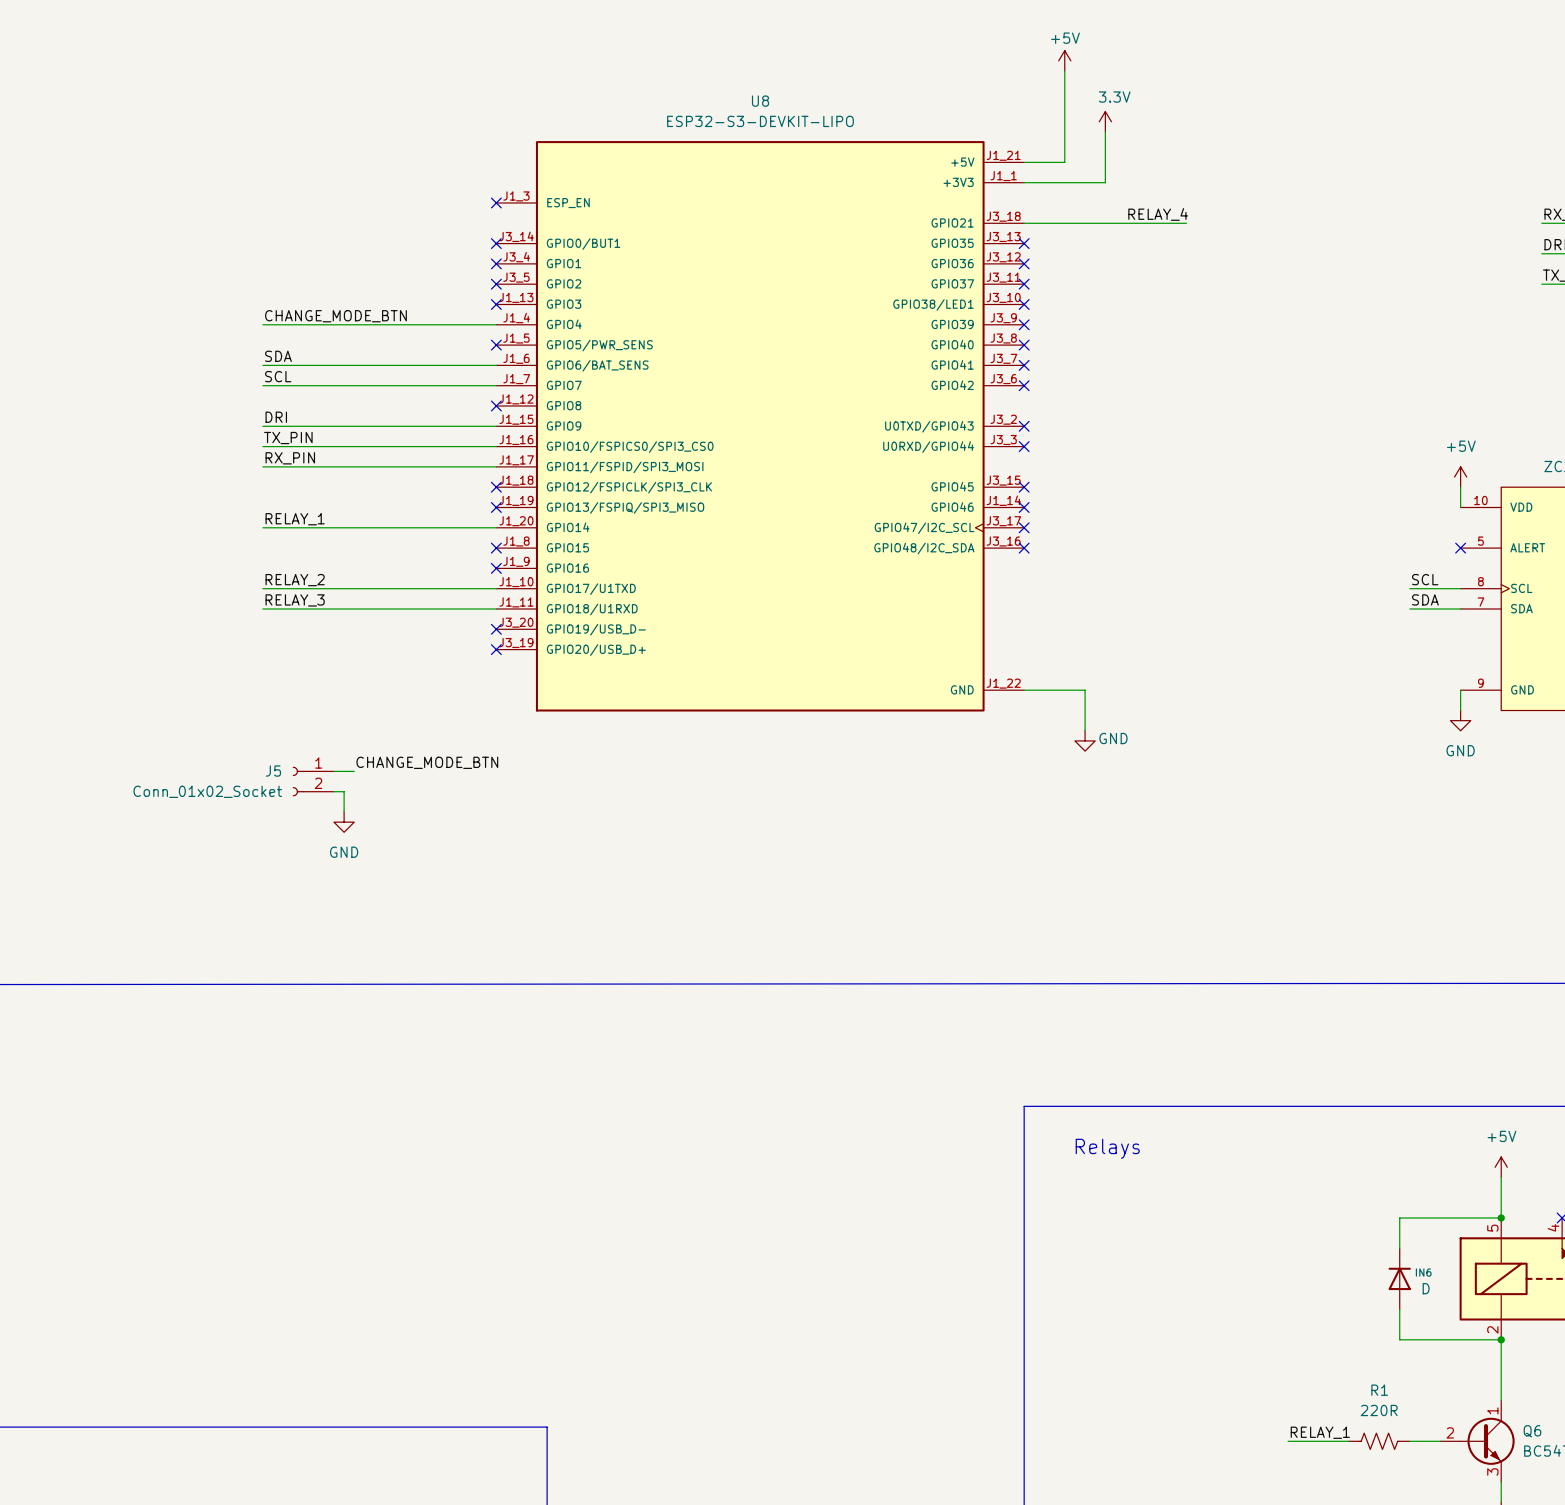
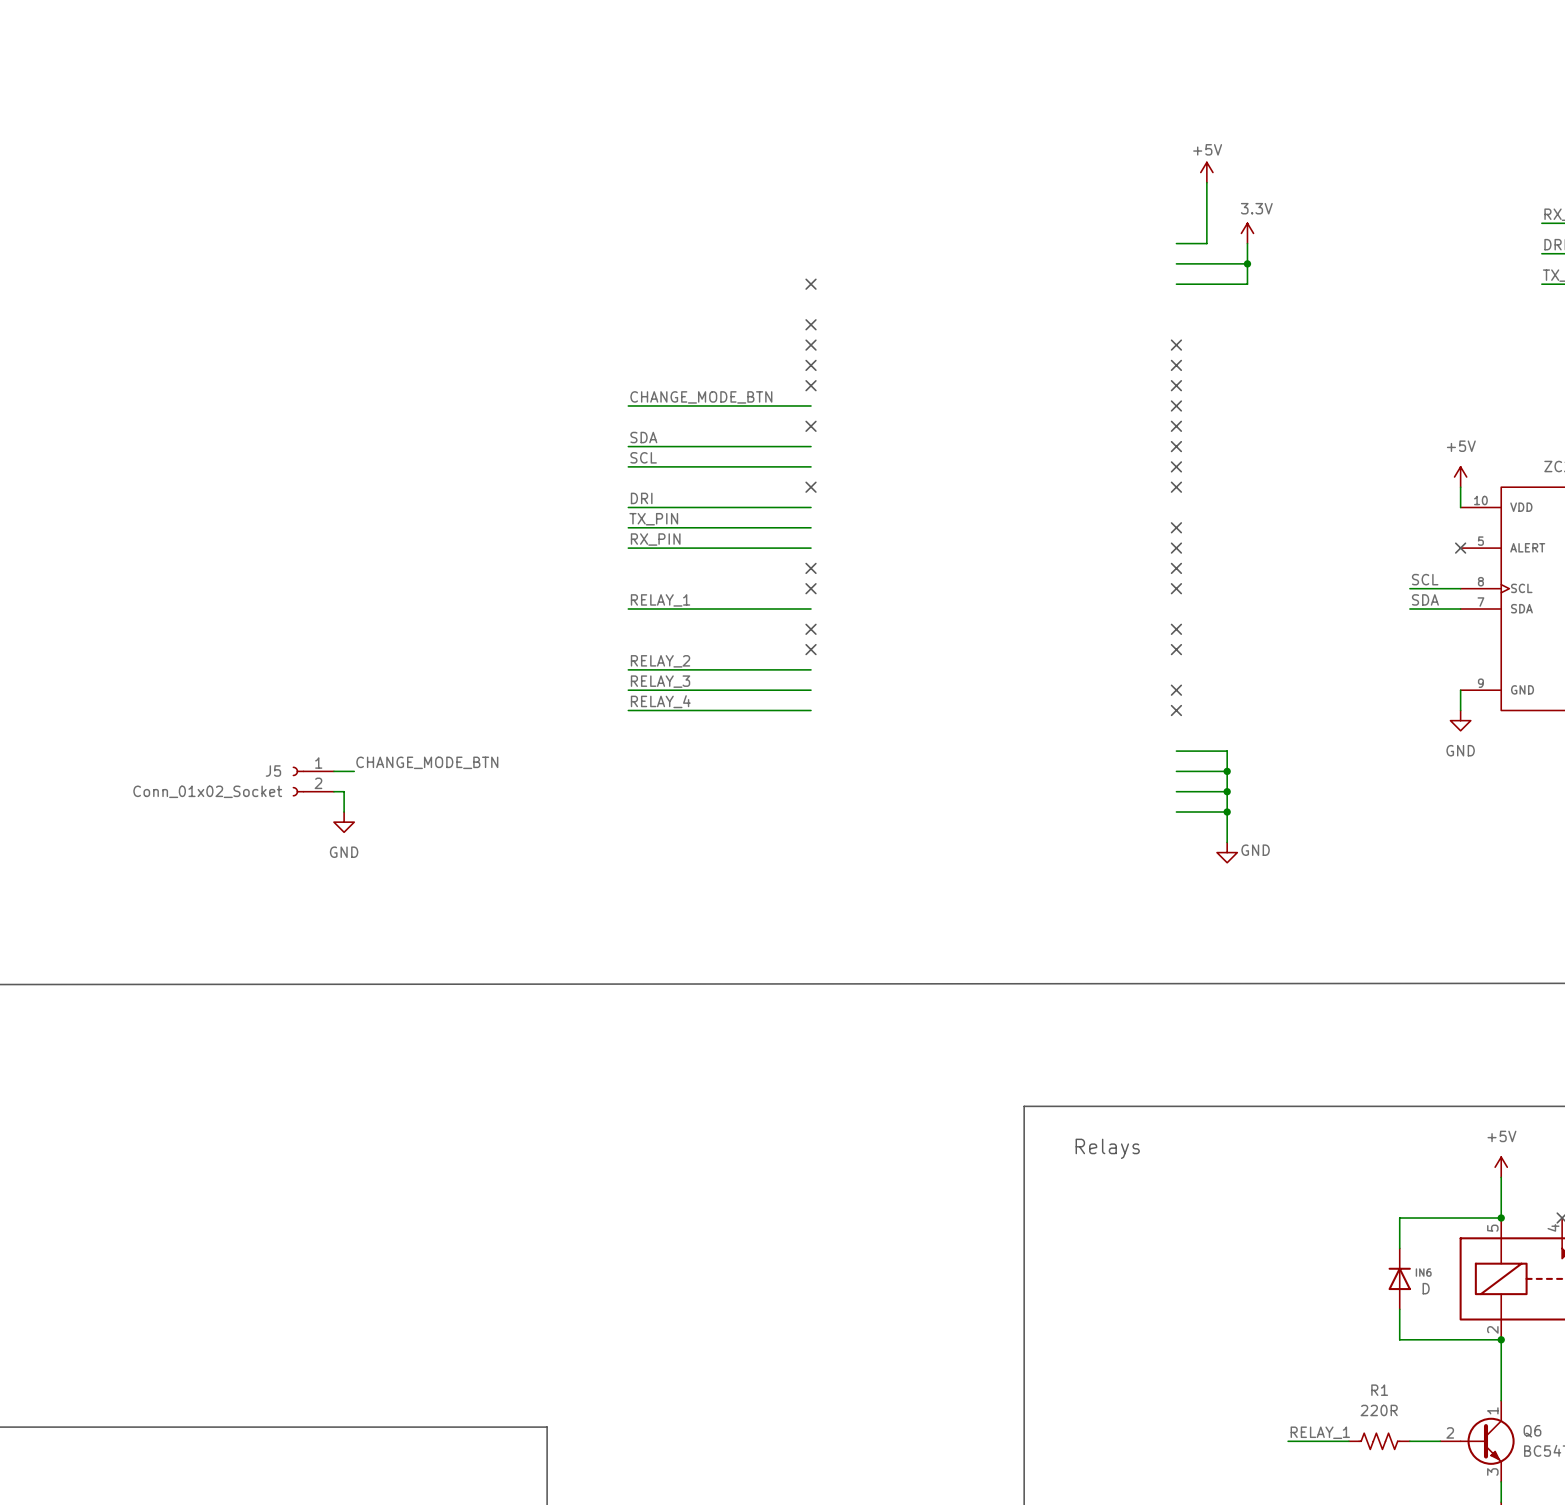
power symbol position: +5V (1064, 60) -> +5V (1206, 172)
wire: (1064, 71) (1064, 162) (1024, 162) -> none
power symbol position: 3.3V (1105, 121) -> 3.3V (1247, 233)
wire: (1105, 131) (1105, 182) (1024, 182) -> none
wire: none -> (1206, 182) (1206, 243) (1176, 243)
no-connect mark: (496, 202) -> none
label: RELAY_4 (1158, 214) -> none
wire: (1024, 223) (1186, 223) -> none
no-connect mark: (496, 243) -> none
no-connect mark: (1024, 243) -> none
wire: none -> (1247, 243) (1247, 284) (1176, 284)
no-connect mark: (496, 263) -> none
no-connect mark: (1024, 263) -> none
wire: none -> (1176, 263) (1247, 263)
junction: none -> (1247, 263)
no-connect mark: (496, 284) -> none
no-connect mark: none -> (811, 284)
no-connect mark: (1024, 284) -> none
no-connect mark: (496, 304) -> none
no-connect mark: (1024, 304) -> none
label: CHANGE_MODE_BTN (335, 316) -> none
wire: (262, 324) (496, 324) -> none
no-connect mark: none -> (811, 324)
no-connect mark: (1024, 324) -> none
no-connect mark: (496, 345) -> none
no-connect mark: none -> (811, 345)
no-connect mark: (1024, 345) -> none
no-connect mark: none -> (1176, 345)
label: SDA (278, 356) -> none
wire: (262, 365) (496, 365) -> none
no-connect mark: none -> (811, 365)
no-connect mark: (1024, 365) -> none
no-connect mark: none -> (1176, 365)
label: SCL (278, 376) -> none
wire: (262, 385) (496, 385) -> none
no-connect mark: none -> (811, 385)
no-connect mark: (1024, 385) -> none
no-connect mark: none -> (1176, 385)
label: none -> CHANGE_MODE_BTN (701, 397)
no-connect mark: (496, 405) -> none
no-connect mark: none -> (1176, 405)
label: DRI (276, 417) -> none
wire: (262, 426) (496, 426) -> none
U8: ESP32-S3-DEVKIT-LIPO (760, 426) -> none
no-connect mark: none -> (811, 426)
no-connect mark: (1024, 426) -> none
no-connect mark: none -> (1176, 426)
label: none -> SDA (643, 437)
label: TX_PIN (288, 438) -> none
wire: (262, 446) (496, 446) -> none
no-connect mark: (1024, 446) -> none
no-connect mark: none -> (1176, 446)
label: none -> SCL (643, 457)
label: RX_PIN (290, 458) -> none
wire: (262, 466) (496, 466) -> none
no-connect mark: none -> (1176, 466)
no-connect mark: (496, 487) -> none
no-connect mark: none -> (811, 487)
no-connect mark: (1024, 487) -> none
no-connect mark: none -> (1176, 487)
label: none -> DRI (641, 498)
no-connect mark: (496, 507) -> none
no-connect mark: (1024, 507) -> none
label: RELAY_1 (295, 519) -> none
label: none -> TX_PIN (653, 519)
wire: (262, 527) (496, 527) -> none
no-connect mark: (1024, 527) -> none
no-connect mark: none -> (1176, 527)
label: none -> RX_PIN (655, 539)
no-connect mark: (496, 548) -> none
no-connect mark: (1024, 548) -> none
no-connect mark: none -> (1176, 548)
no-connect mark: (496, 568) -> none
no-connect mark: none -> (811, 568)
no-connect mark: none -> (1176, 568)
label: RELAY_2 (295, 580) -> none
wire: (262, 588) (496, 588) -> none
no-connect mark: none -> (811, 588)
no-connect mark: none -> (1176, 588)
label: RELAY_3 (295, 600) -> none
label: none -> RELAY_1 (660, 600)
wire: (262, 608) (496, 608) -> none
no-connect mark: (496, 629) -> none
no-connect mark: none -> (811, 629)
no-connect mark: none -> (1176, 629)
no-connect mark: (496, 649) -> none
no-connect mark: none -> (811, 649)
no-connect mark: none -> (1176, 649)
label: none -> RELAY_2 (660, 661)
label: none -> RELAY_3 (660, 681)
wire: (1024, 690) (1085, 690) (1085, 730) -> none
no-connect mark: none -> (1176, 690)
label: none -> RELAY_4 (660, 701)
no-connect mark: none -> (1176, 710)
power symbol position: GND (1085, 740) -> GND (1227, 852)
wire: none -> (1176, 751) (1227, 751) (1227, 842)
wire: none -> (1176, 771) (1227, 771)
junction: none -> (1227, 771)
wire: none -> (1176, 791) (1227, 791)
junction: none -> (1227, 791)
wire: none -> (1176, 812) (1227, 812)
junction: none -> (1227, 812)

